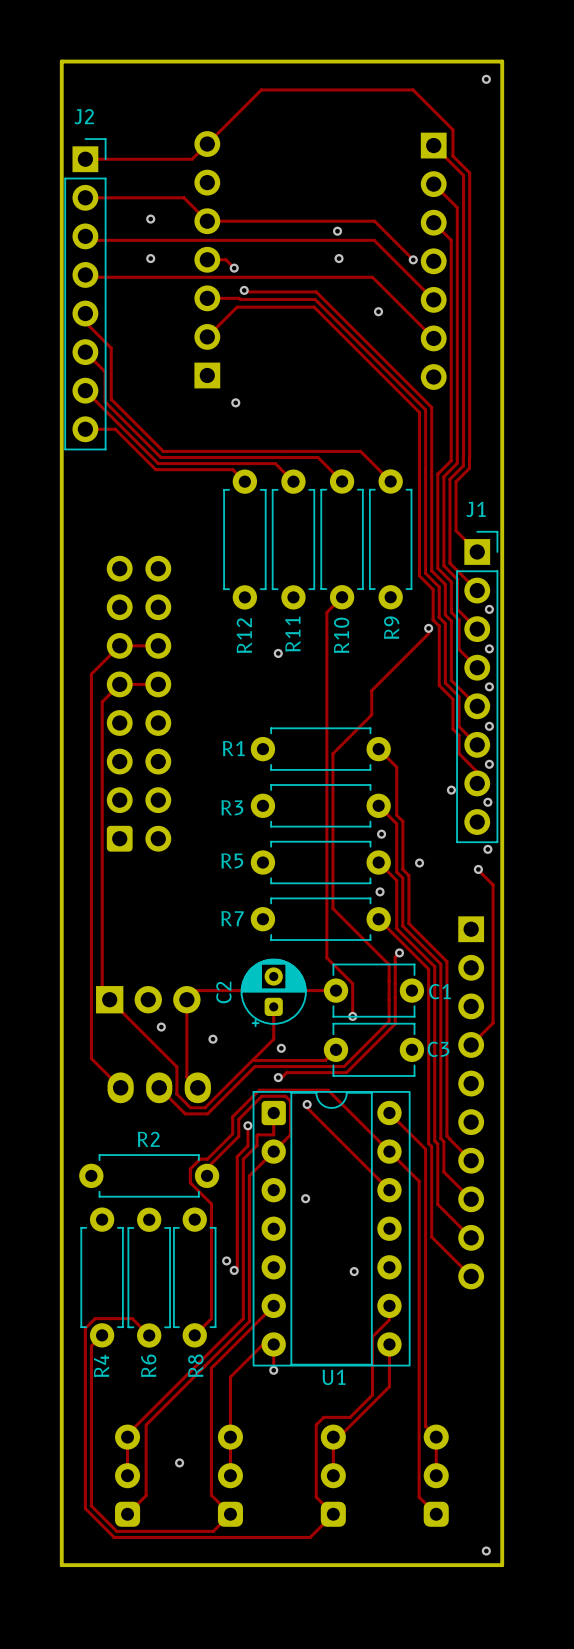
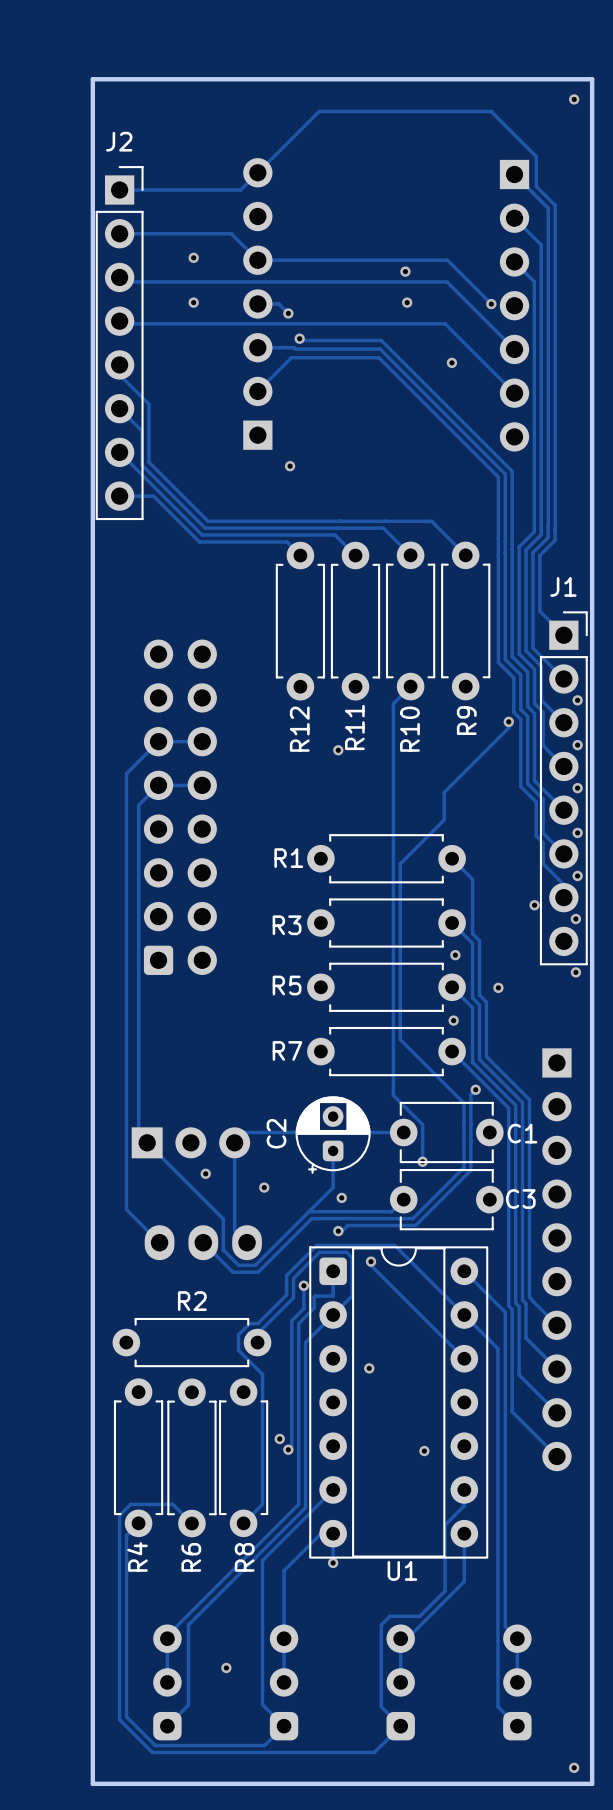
track: (478, 869) (493, 884) (493, 1023) (471, 1044) -> none
via: (478, 869) -> none

